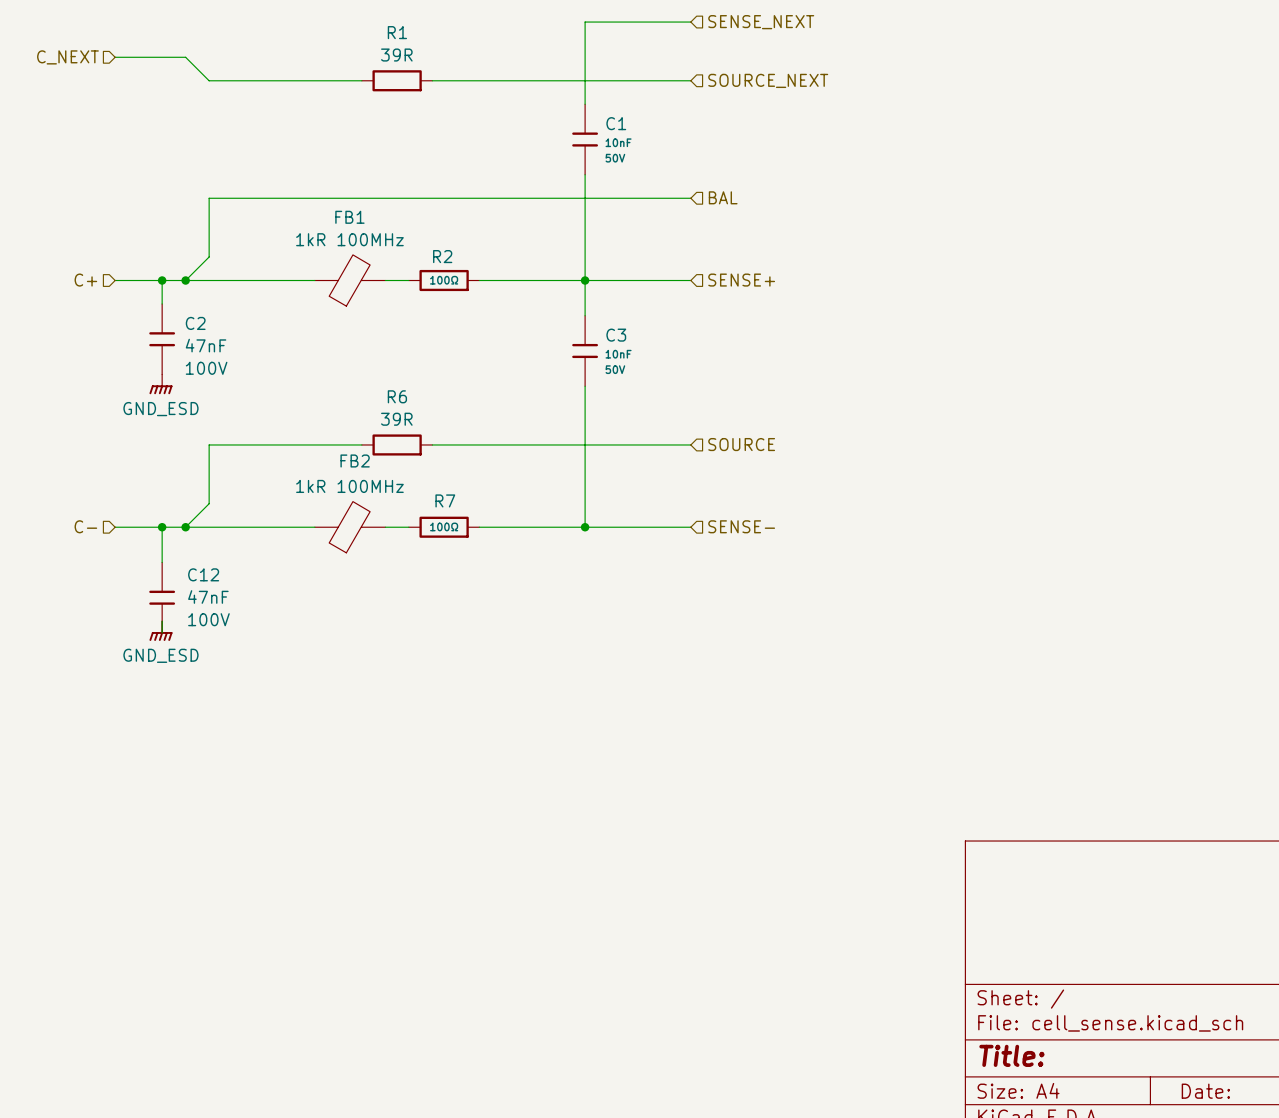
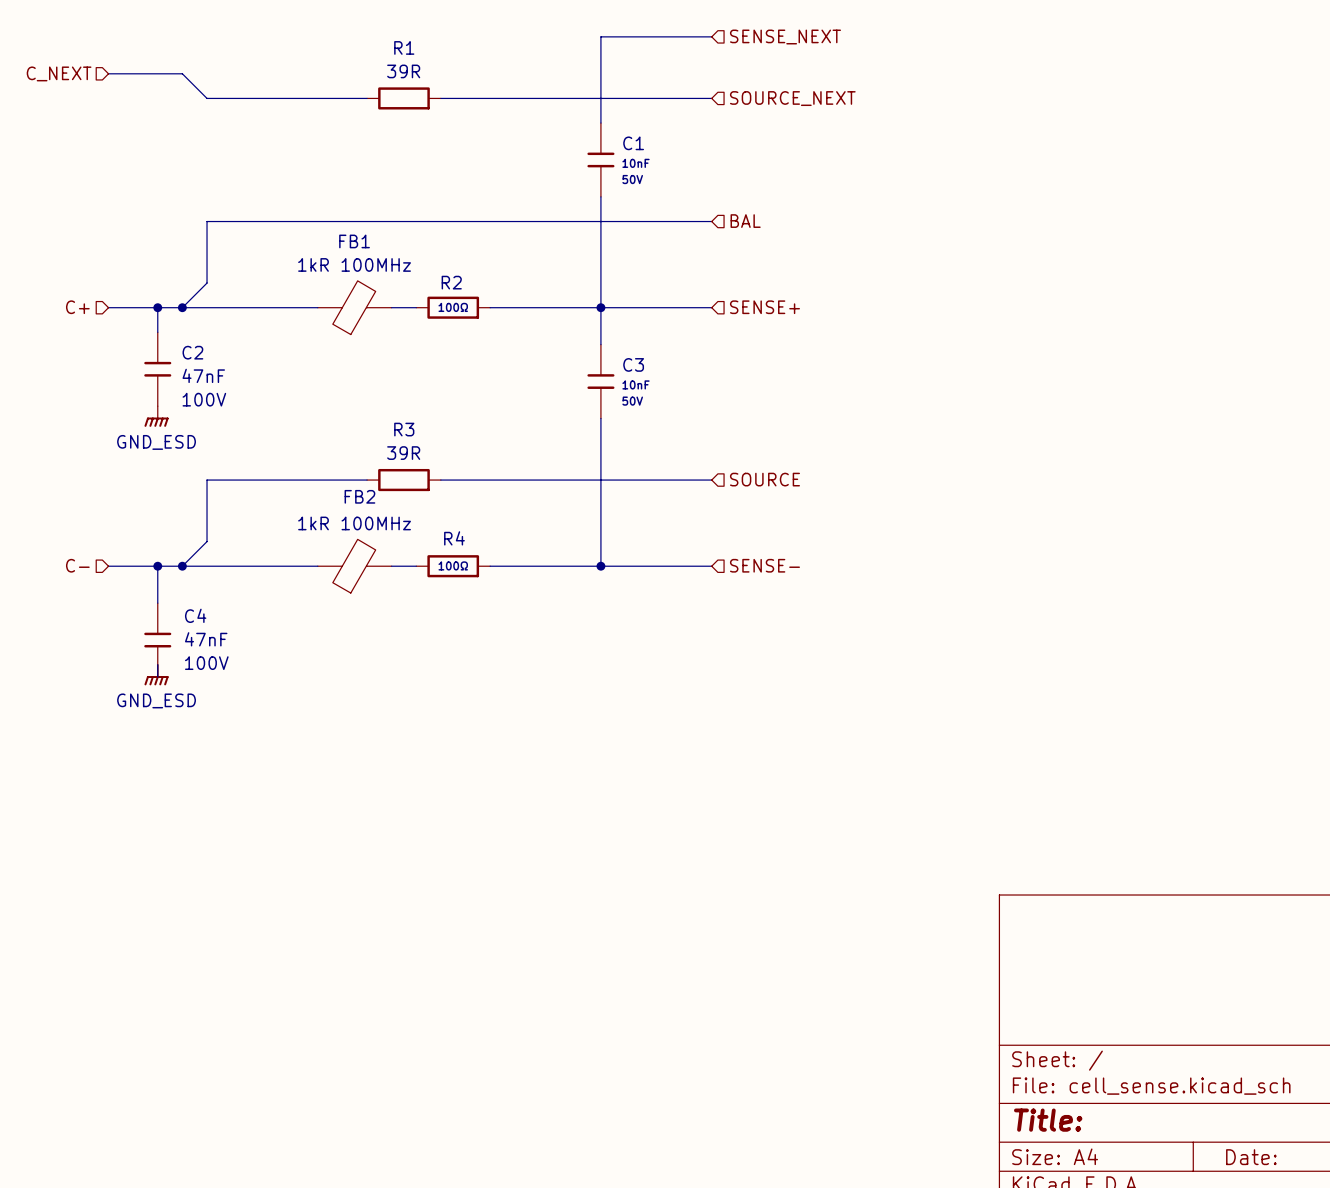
R6 name: R6 (397, 396) -> R3 (404, 429)
R7 name: R7 (445, 500) -> R4 (454, 538)
C12 name: C12 (203, 574) -> C4 (195, 615)

